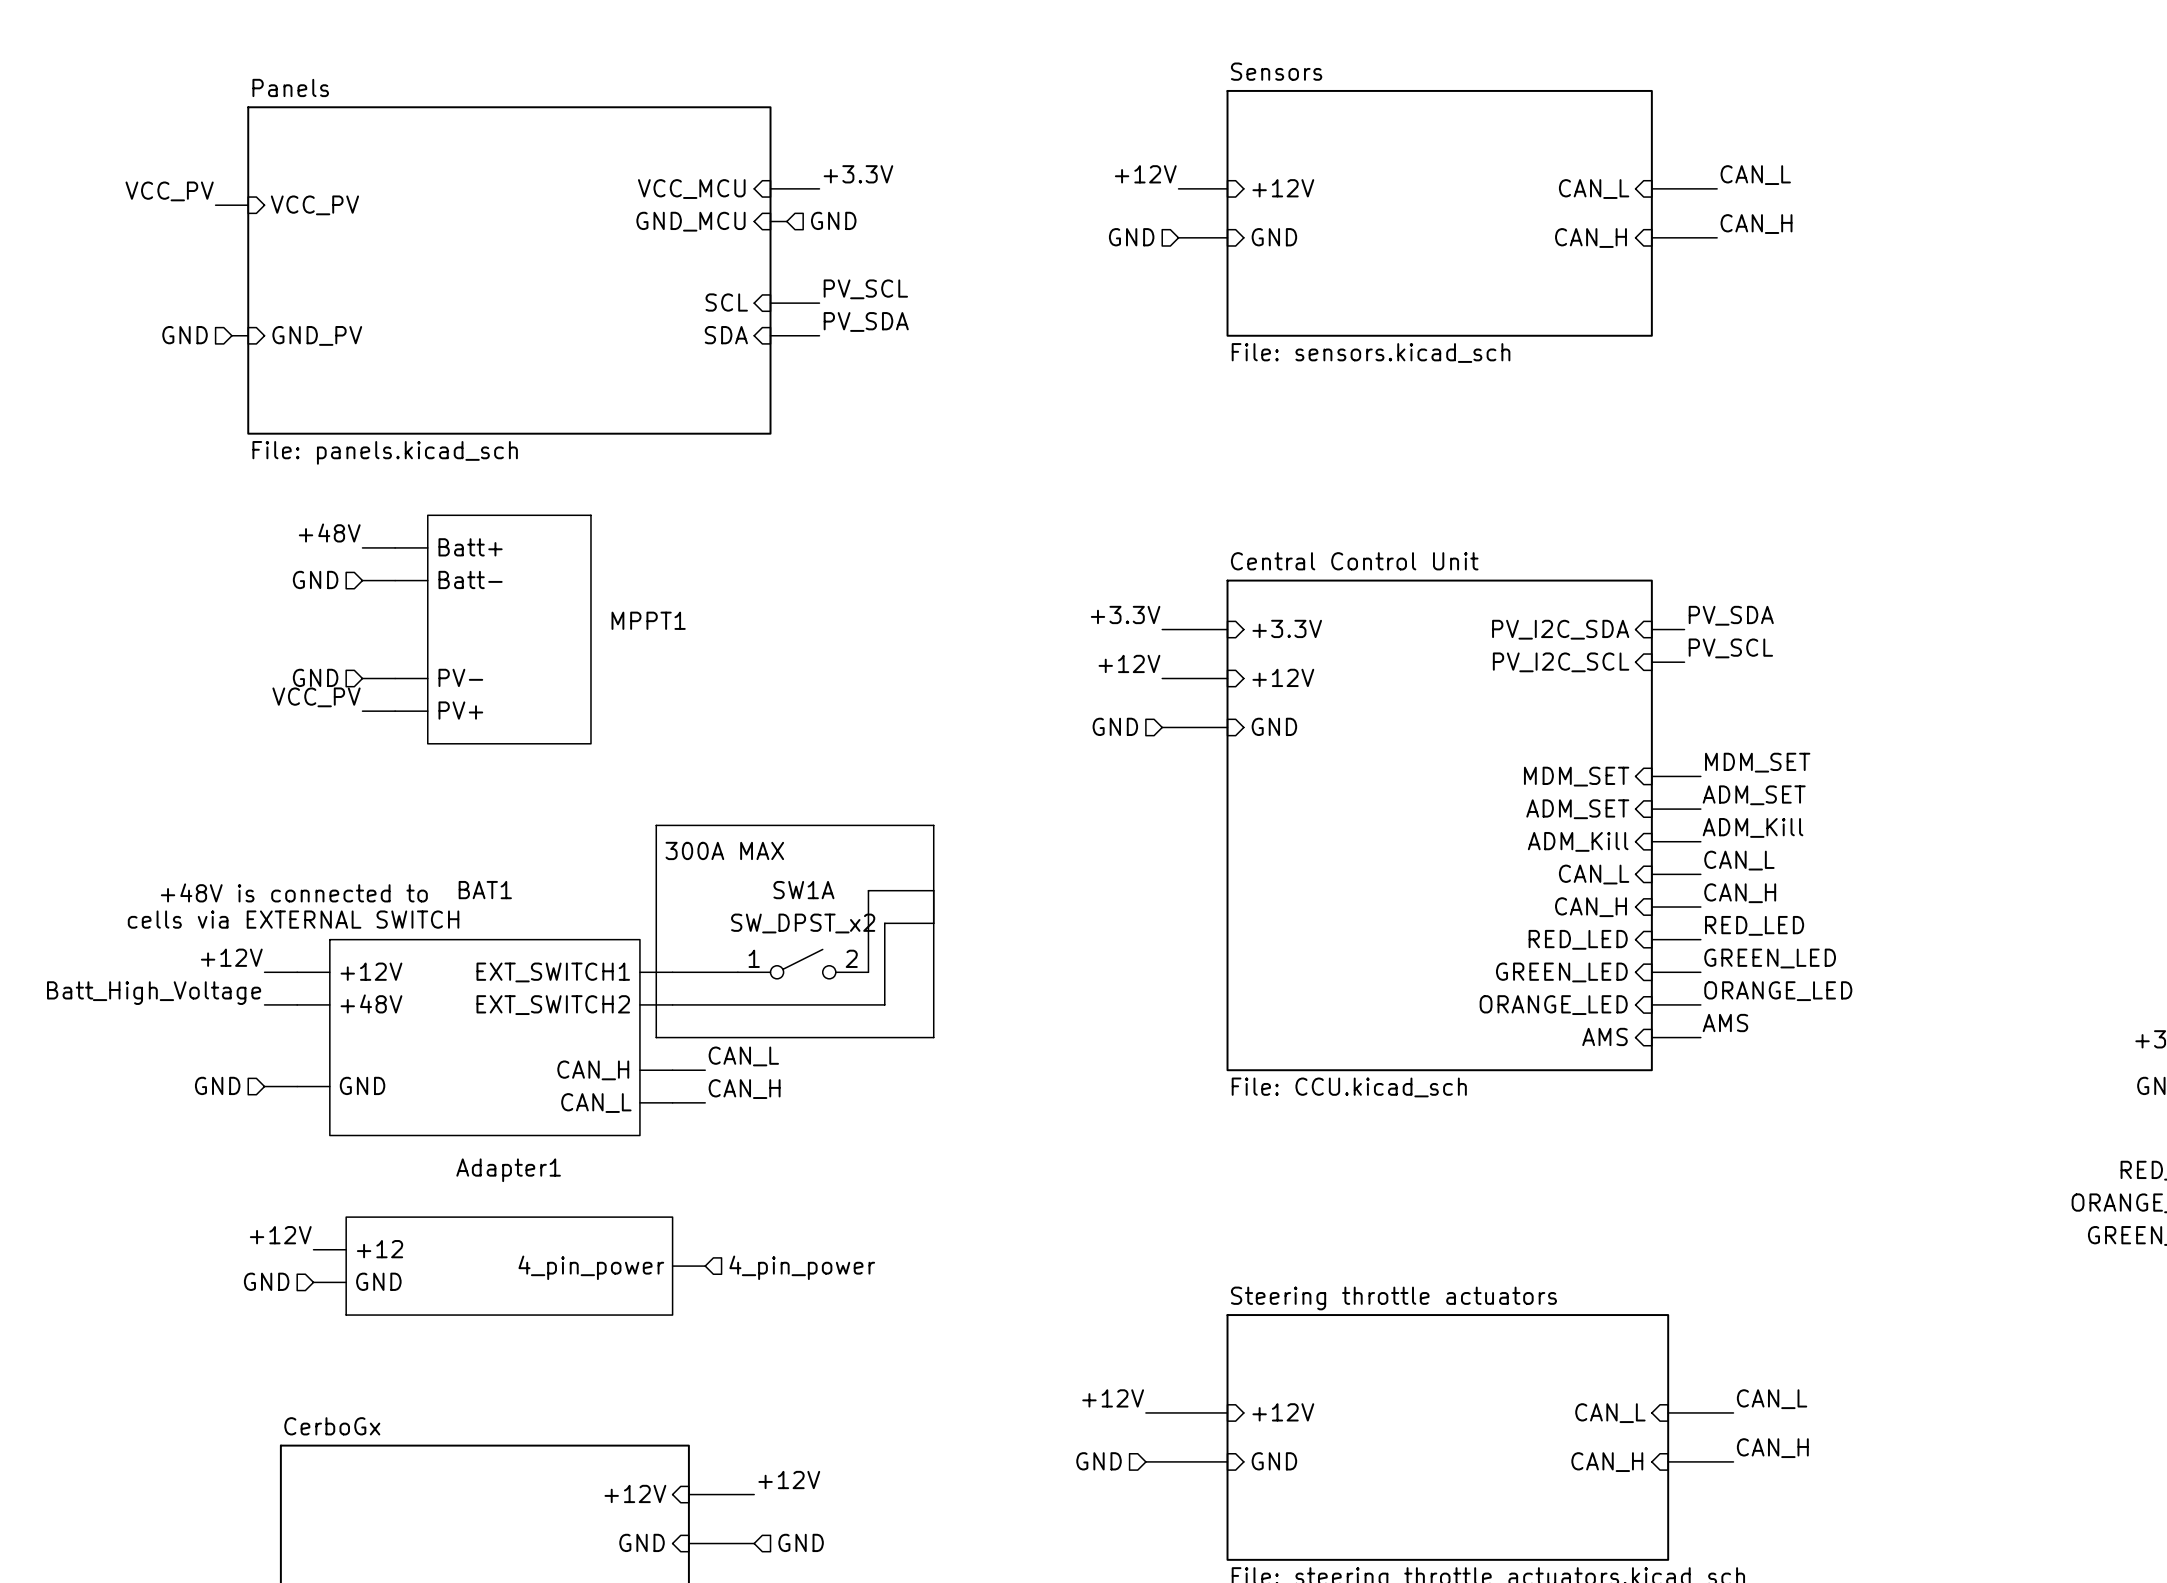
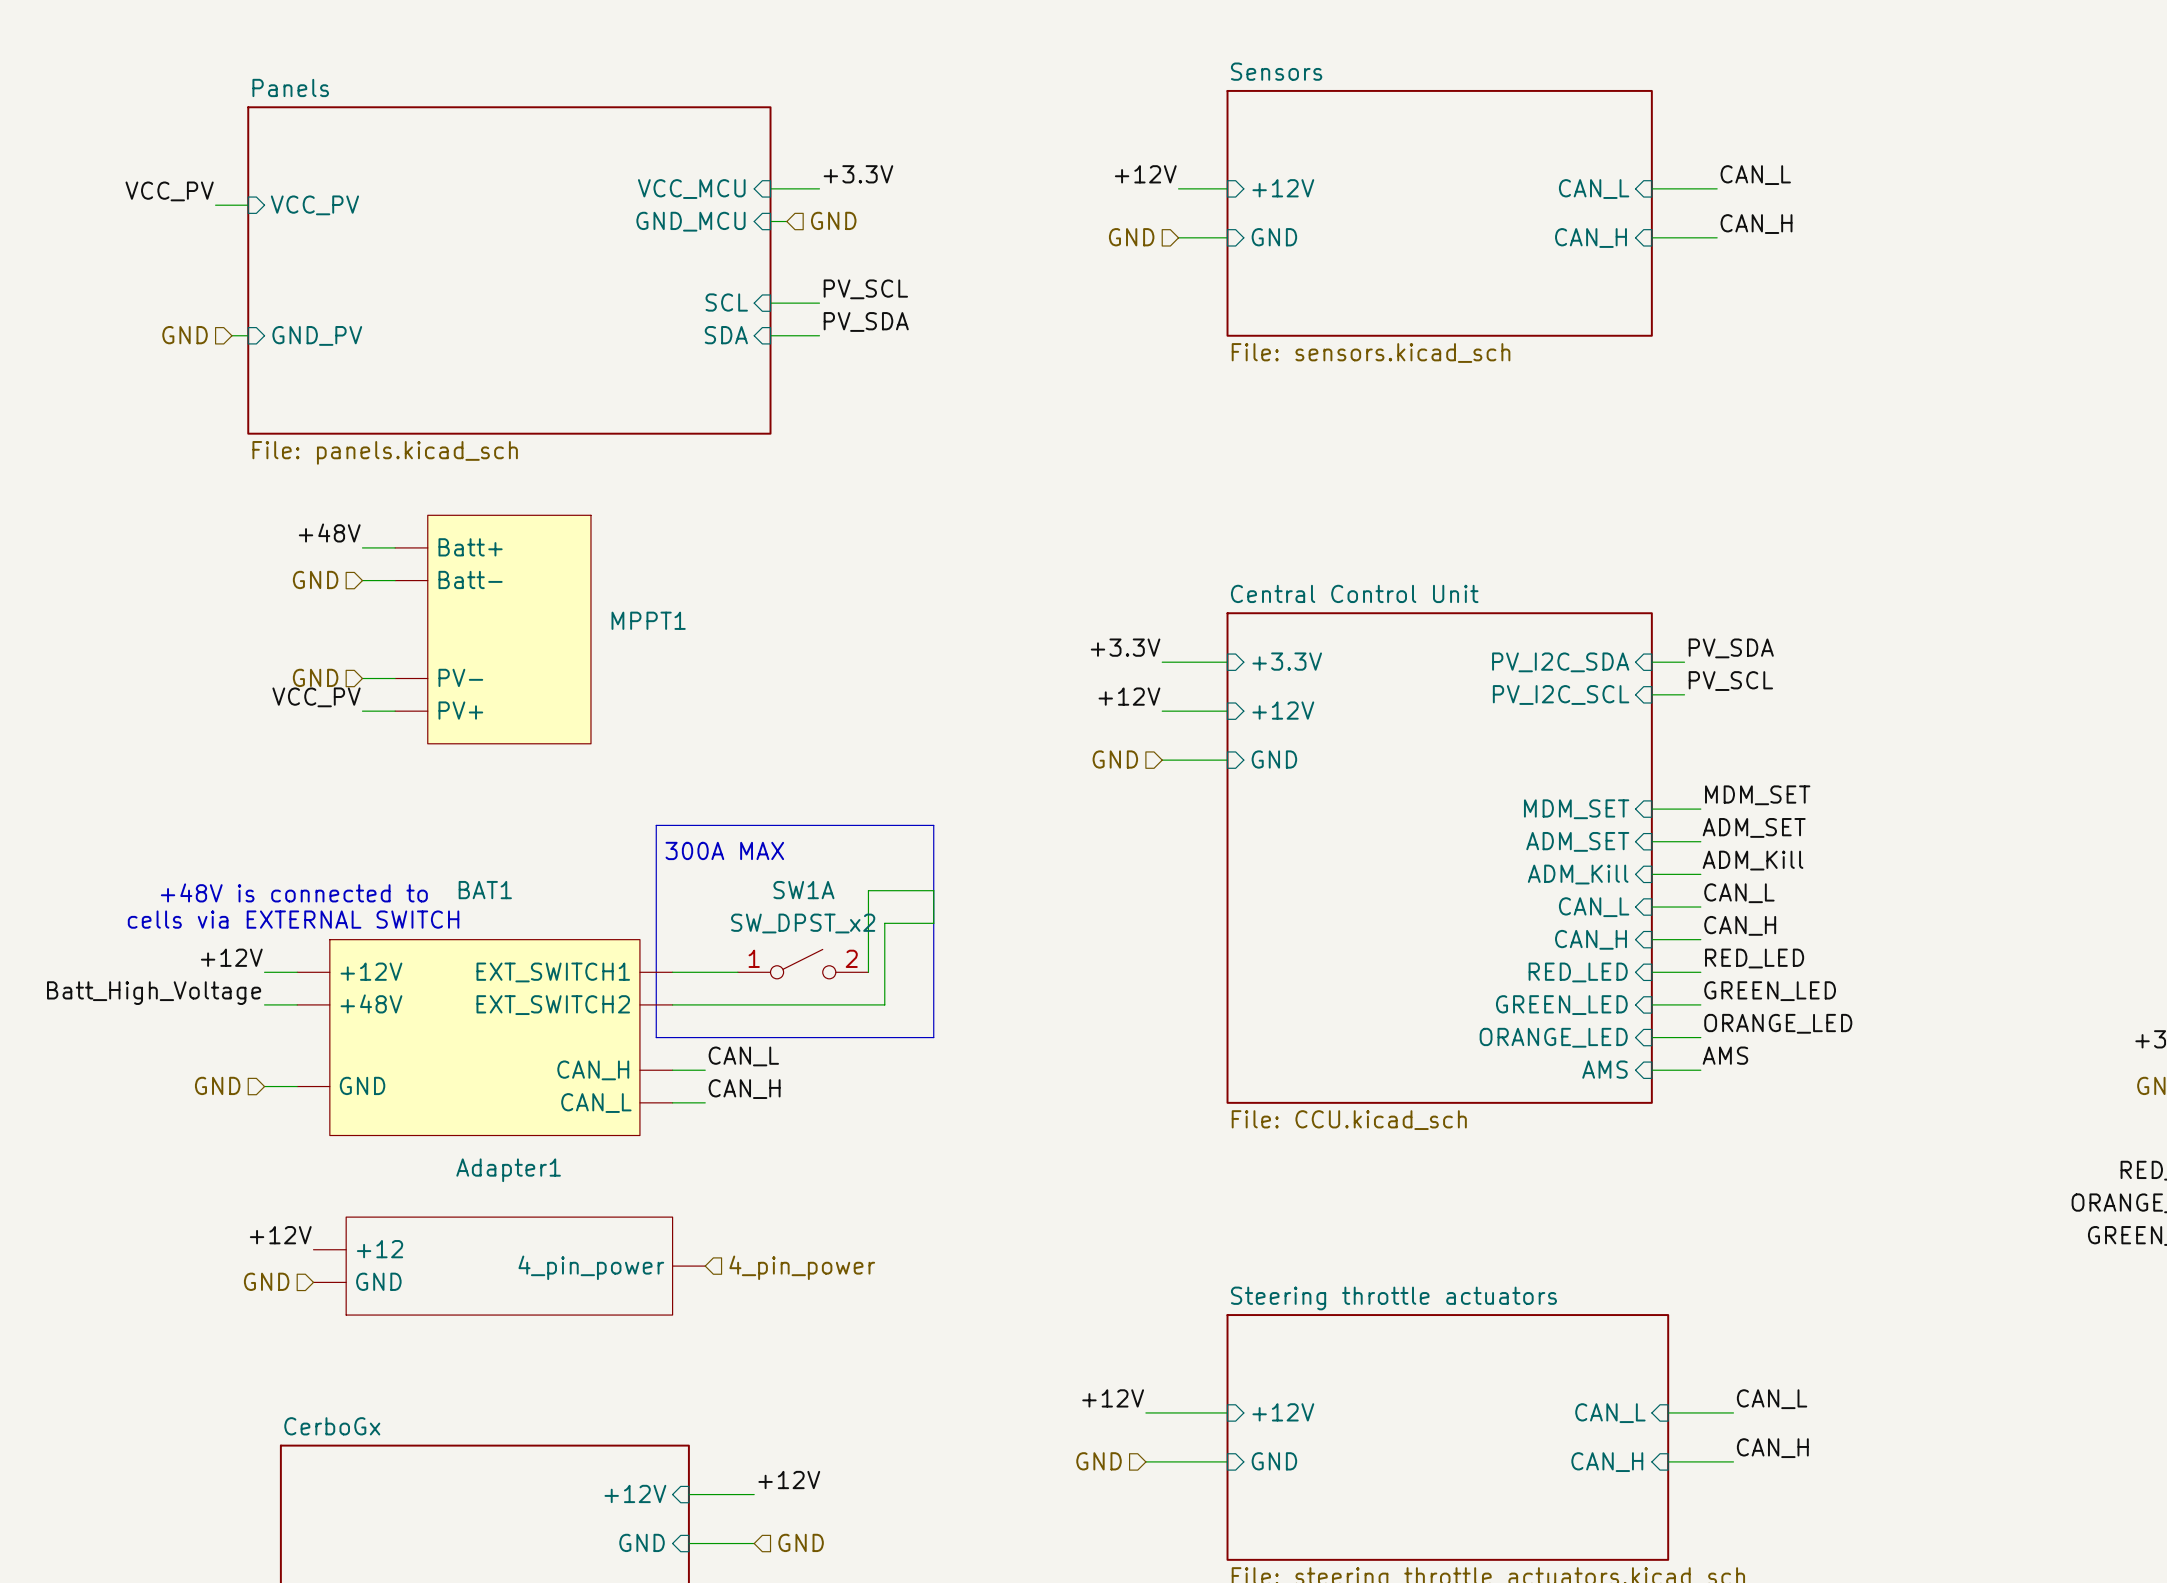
label position: +3.3V (1125, 614) -> +3.3V (1125, 647)
label: PV_SDA (1731, 615) -> none
sheet pin position: +3.3V (1287, 628) -> +3.3V (1287, 661)
wire: (1162, 629) (1227, 629) -> (1162, 662) (1227, 662)
sheet pin: PV_I2C_SDA (1560, 629) -> none
wire: (1651, 629) (1684, 629) -> (1651, 694) (1684, 694)
label: PV_SCL (1730, 648) -> PV_SDA (1731, 648)
sheet pin: PV_I2C_SCL (1561, 662) -> PV_I2C_SDA (1560, 662)
label position: +12V (1129, 663) -> +12V (1129, 696)
sheet pin position: +12V (1283, 677) -> +12V (1283, 710)
wire: (1162, 678) (1227, 678) -> (1162, 711) (1227, 711)
label: none -> PV_SCL (1730, 681)
sheet pin: none -> PV_I2C_SCL (1561, 695)
hierarchical label position: GND (1115, 726) -> GND (1115, 759)
sheet pin position: GND (1274, 726) -> GND (1274, 759)
wire: (1162, 727) (1227, 727) -> (1162, 760) (1227, 760)
label: MDM_SET (1757, 762) -> none
sheet pin: MDM_SET (1576, 776) -> none
wire: (1651, 776) (1700, 776) -> (1651, 1070) (1700, 1070)
label: ADM_SET (1754, 795) -> MDM_SET (1757, 795)
sheet pin: ADM_SET (1577, 809) -> MDM_SET (1576, 809)
sheet Central Control Unit position: (1439, 825) -> (1439, 858)
label: ADM_Kill (1753, 827) -> ADM_SET (1754, 827)
sheet pin: ADM_Kill (1578, 841) -> ADM_SET (1577, 841)
label: CAN_L (1739, 860) -> ADM_Kill (1753, 860)
sheet pin: CAN_L (1594, 874) -> ADM_Kill (1578, 874)
label: CAN_H (1740, 893) -> CAN_L (1739, 893)
sheet pin: CAN_H (1590, 907) -> CAN_L (1594, 907)
label: RED_LED (1754, 925) -> CAN_H (1740, 925)
sheet pin: RED_LED (1578, 939) -> CAN_H (1590, 939)
label: GREEN_LED (1770, 958) -> RED_LED (1754, 958)
sheet pin: GREEN_LED (1561, 972) -> RED_LED (1578, 972)
label: ORANGE_LED (1778, 991) -> GREEN_LED (1770, 991)
sheet pin: ORANGE_LED (1553, 1005) -> GREEN_LED (1561, 1005)
label: AMS (1725, 1023) -> ORANGE_LED (1778, 1023)
sheet pin: AMS (1604, 1036) -> ORANGE_LED (1553, 1037)
label: none -> AMS (1725, 1055)
sheet pin: none -> AMS (1604, 1069)

